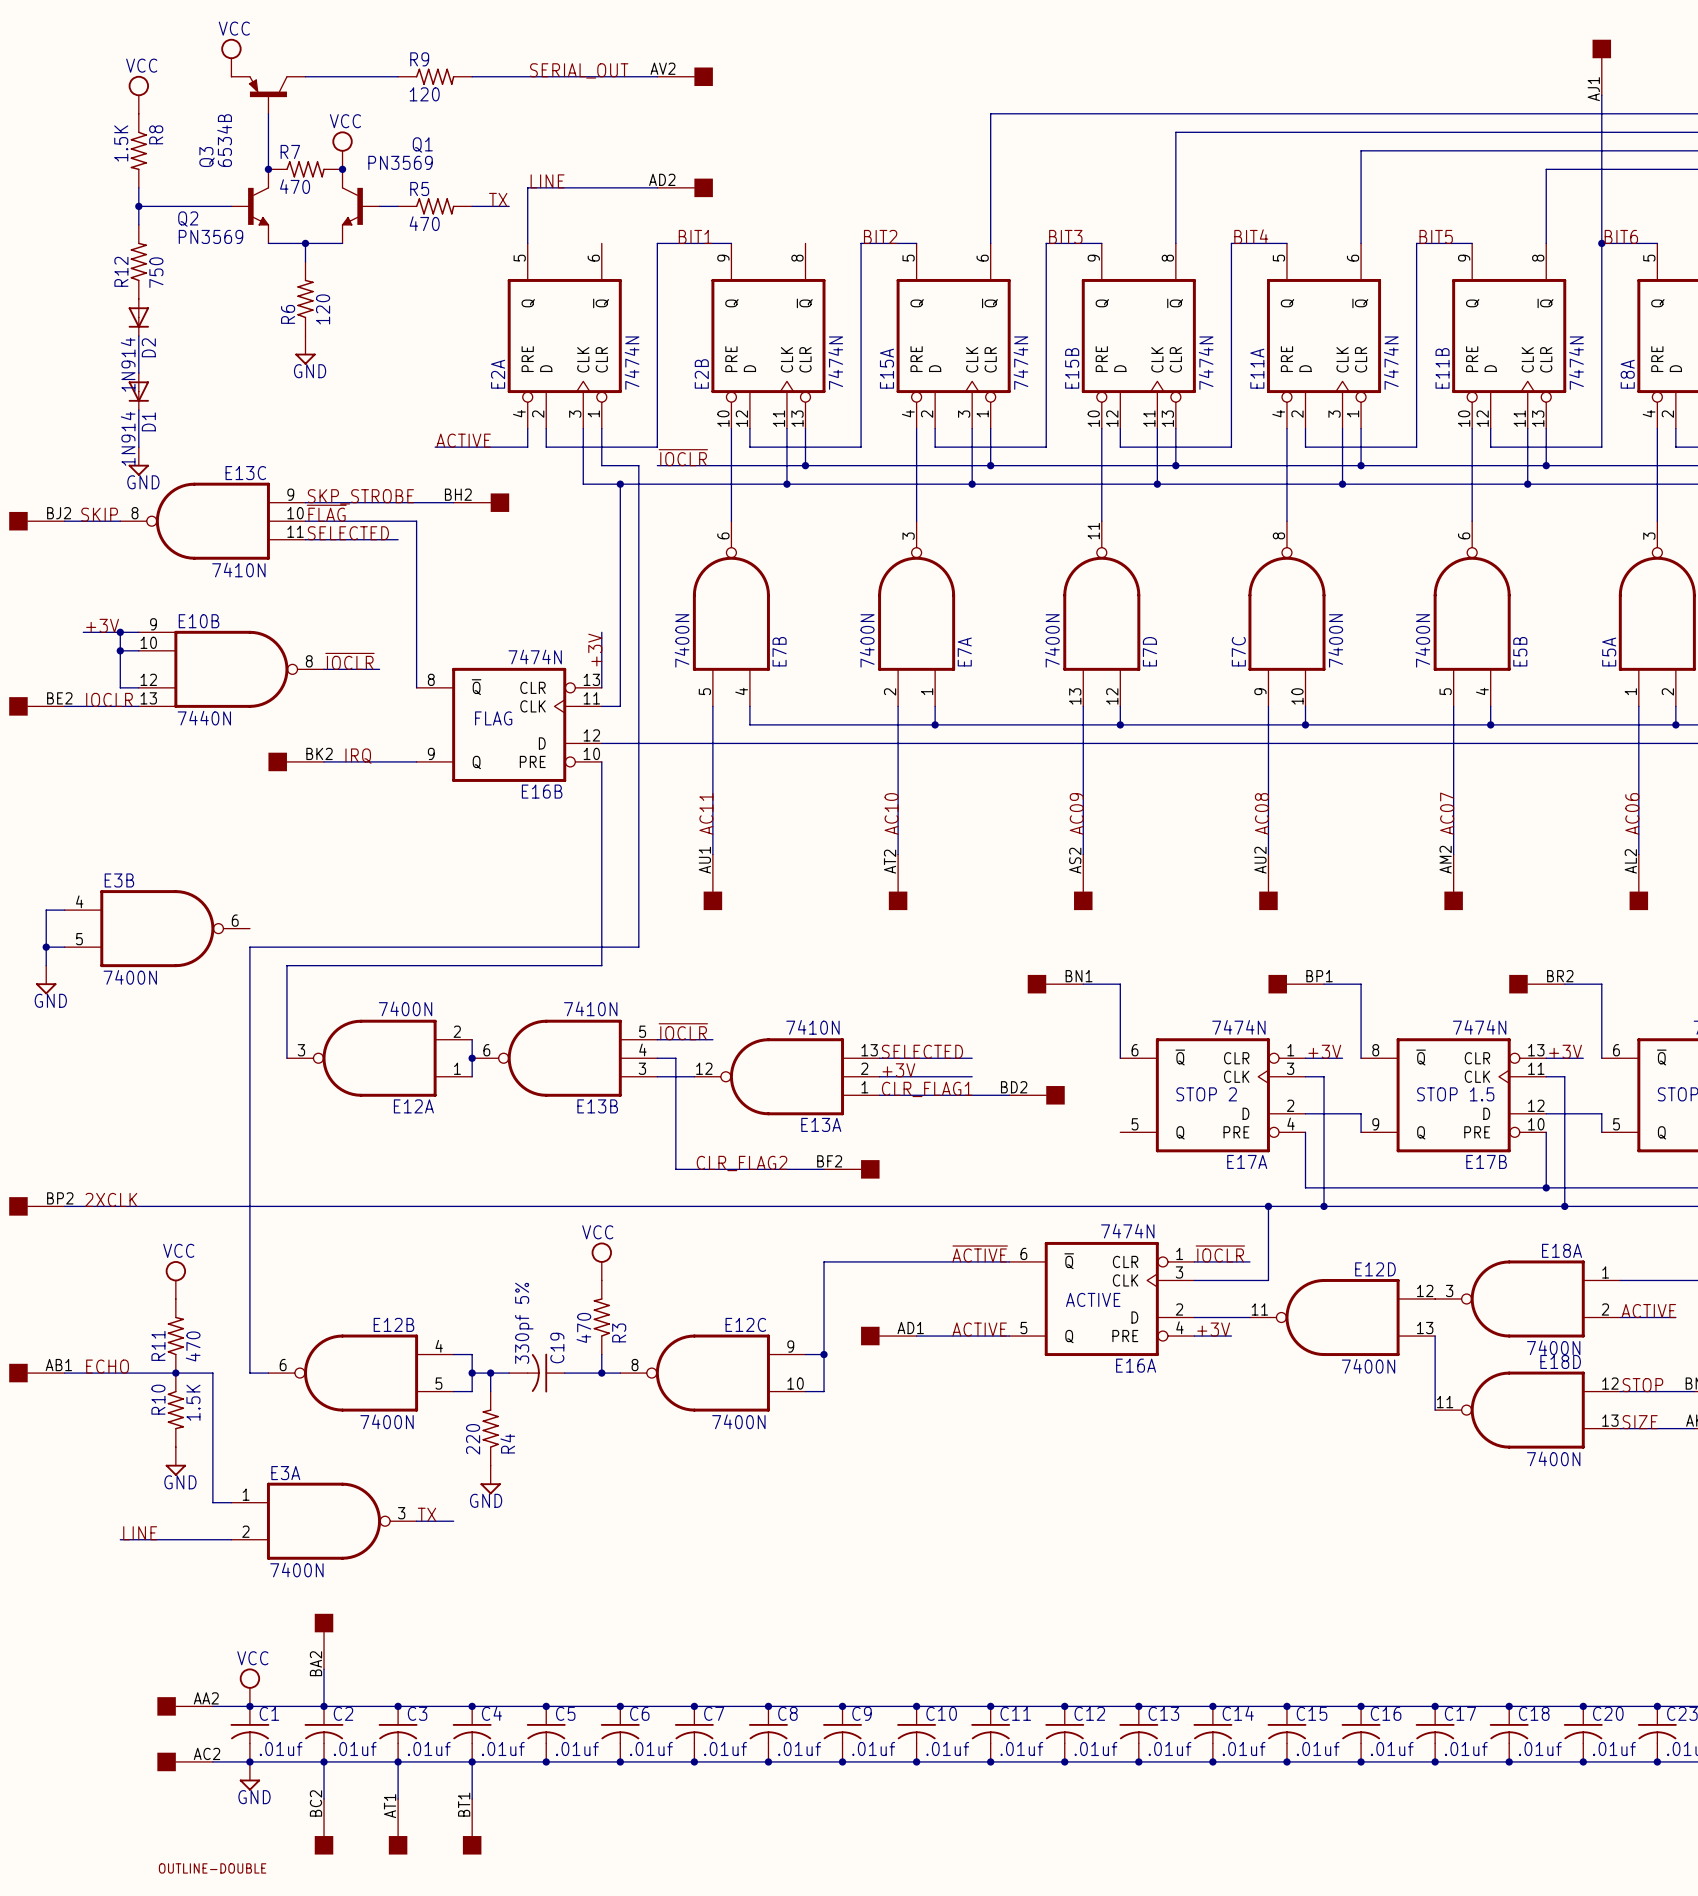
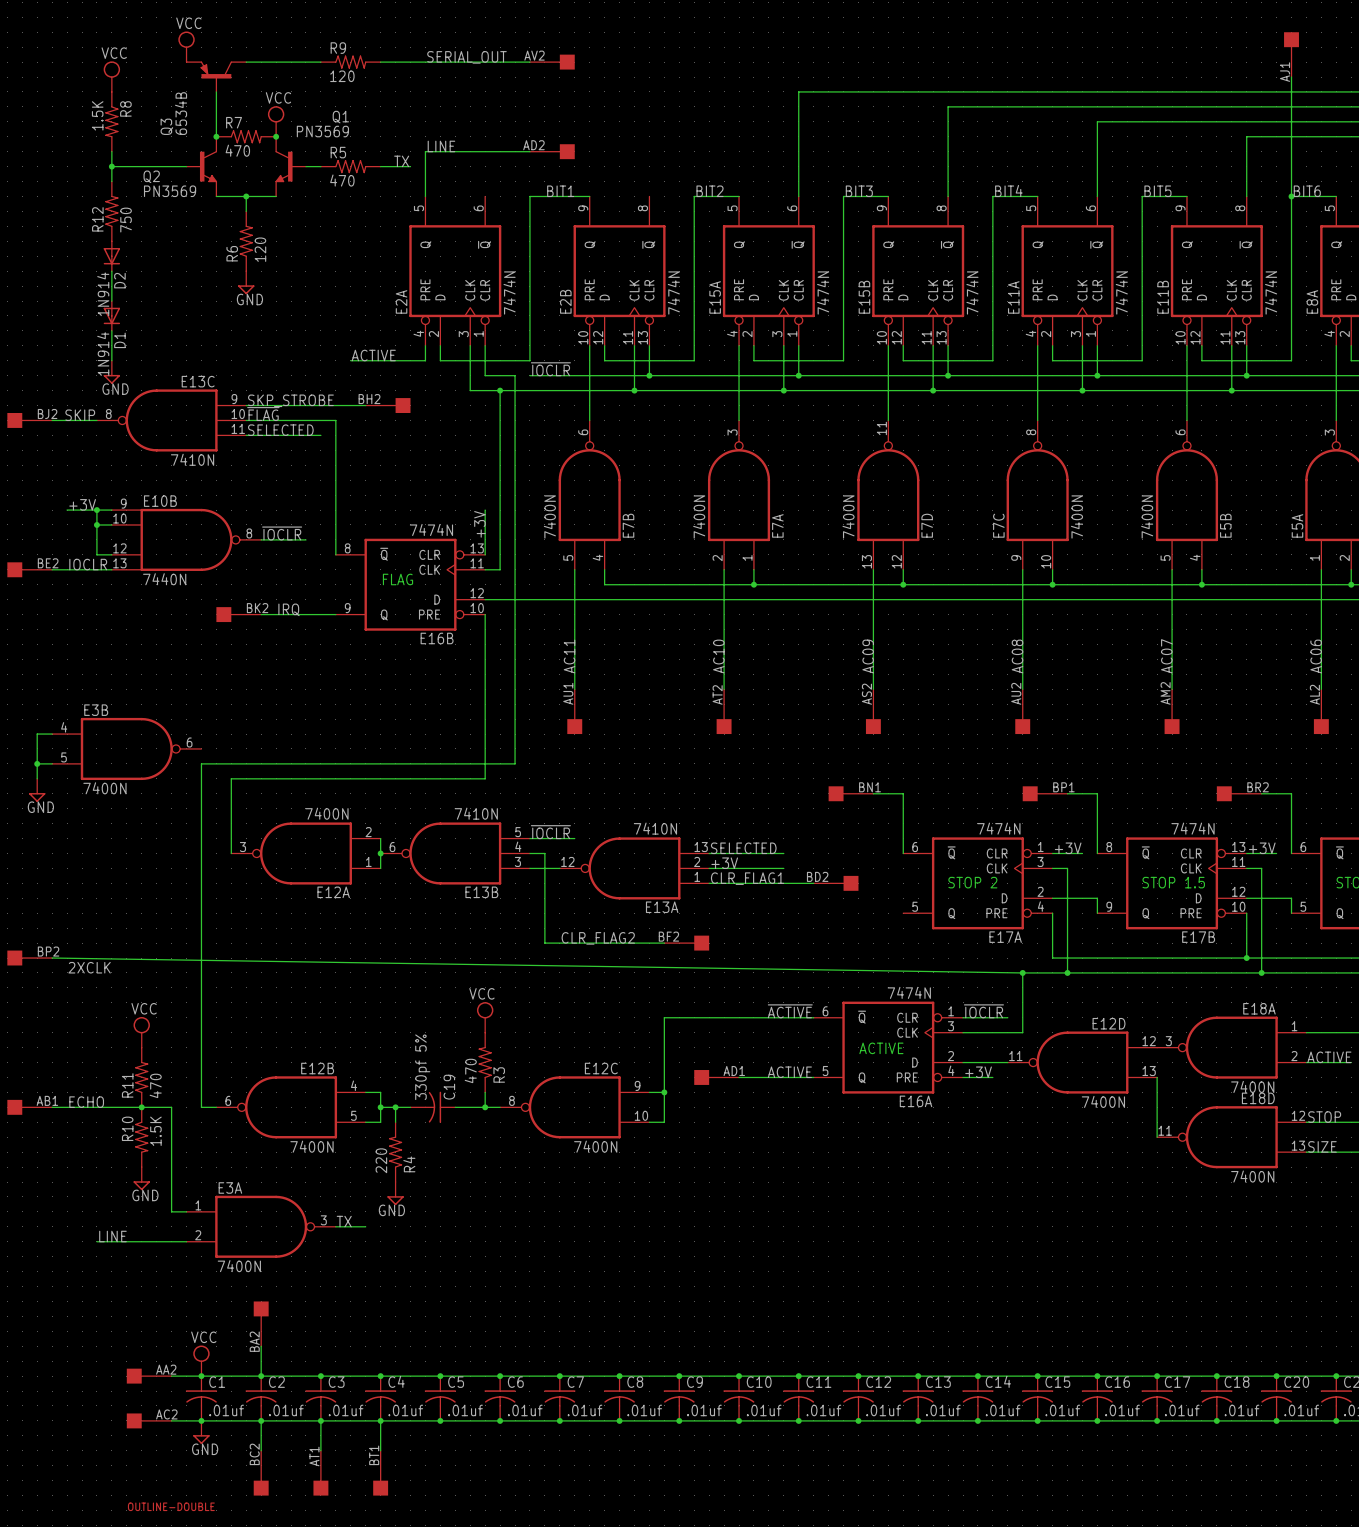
part position: (36, 1206) -> (29, 958)
wire: (64, 1206) (1268, 1206) -> (52, 958) (1022, 972)

